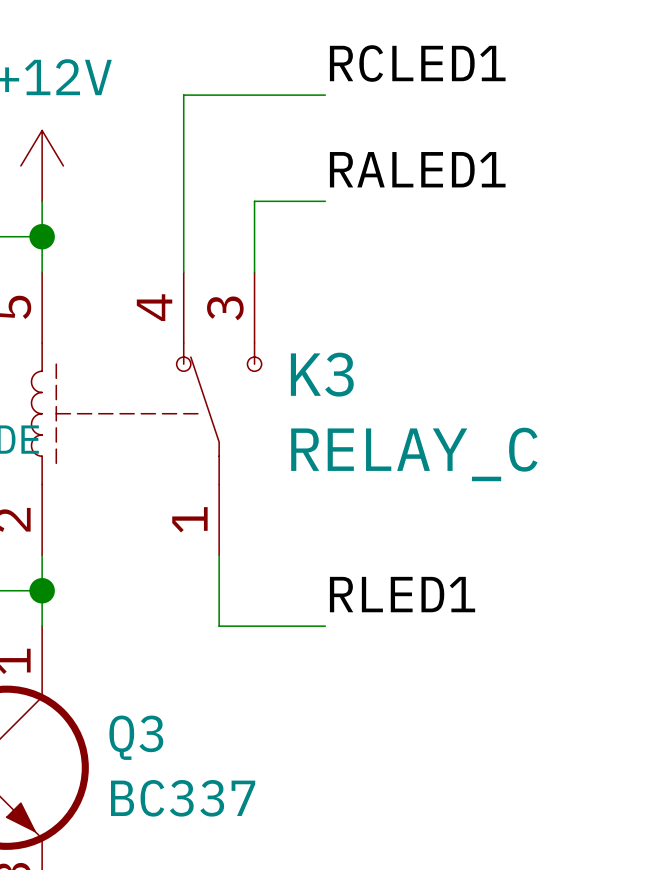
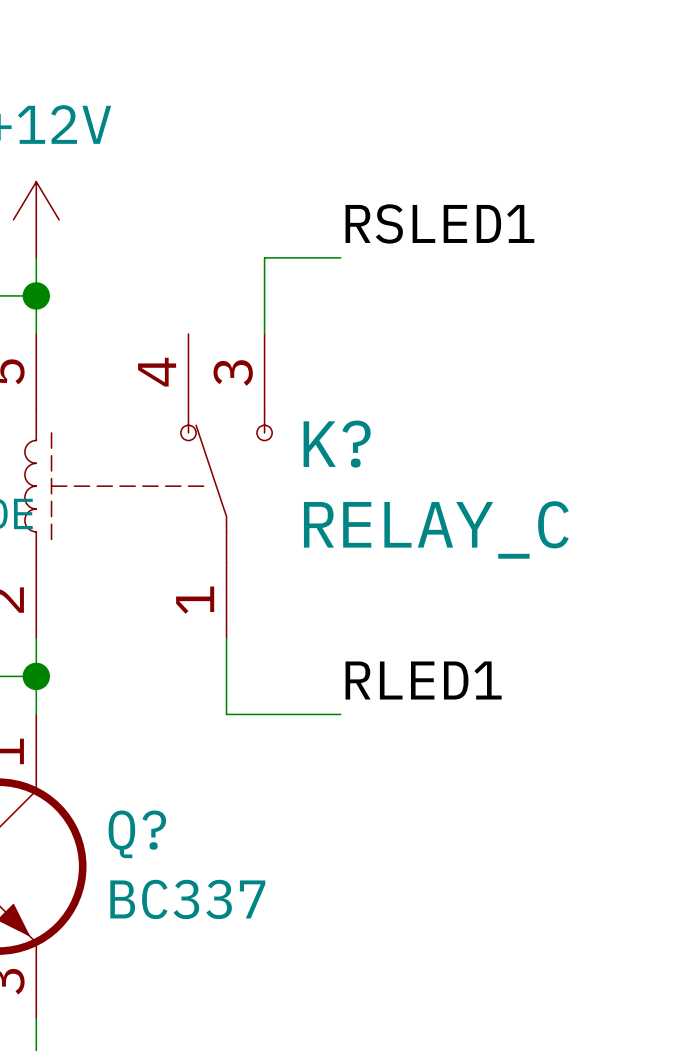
label: RCLED1 (417, 63) -> none
wire: (325, 95) (183, 95) (183, 272) -> none
label: RALED1 (417, 169) -> RSLED1 (439, 223)
K3 name: K3 (322, 374) -> K? (337, 444)
Q3 name: Q3 (136, 737) -> Q? (137, 834)

